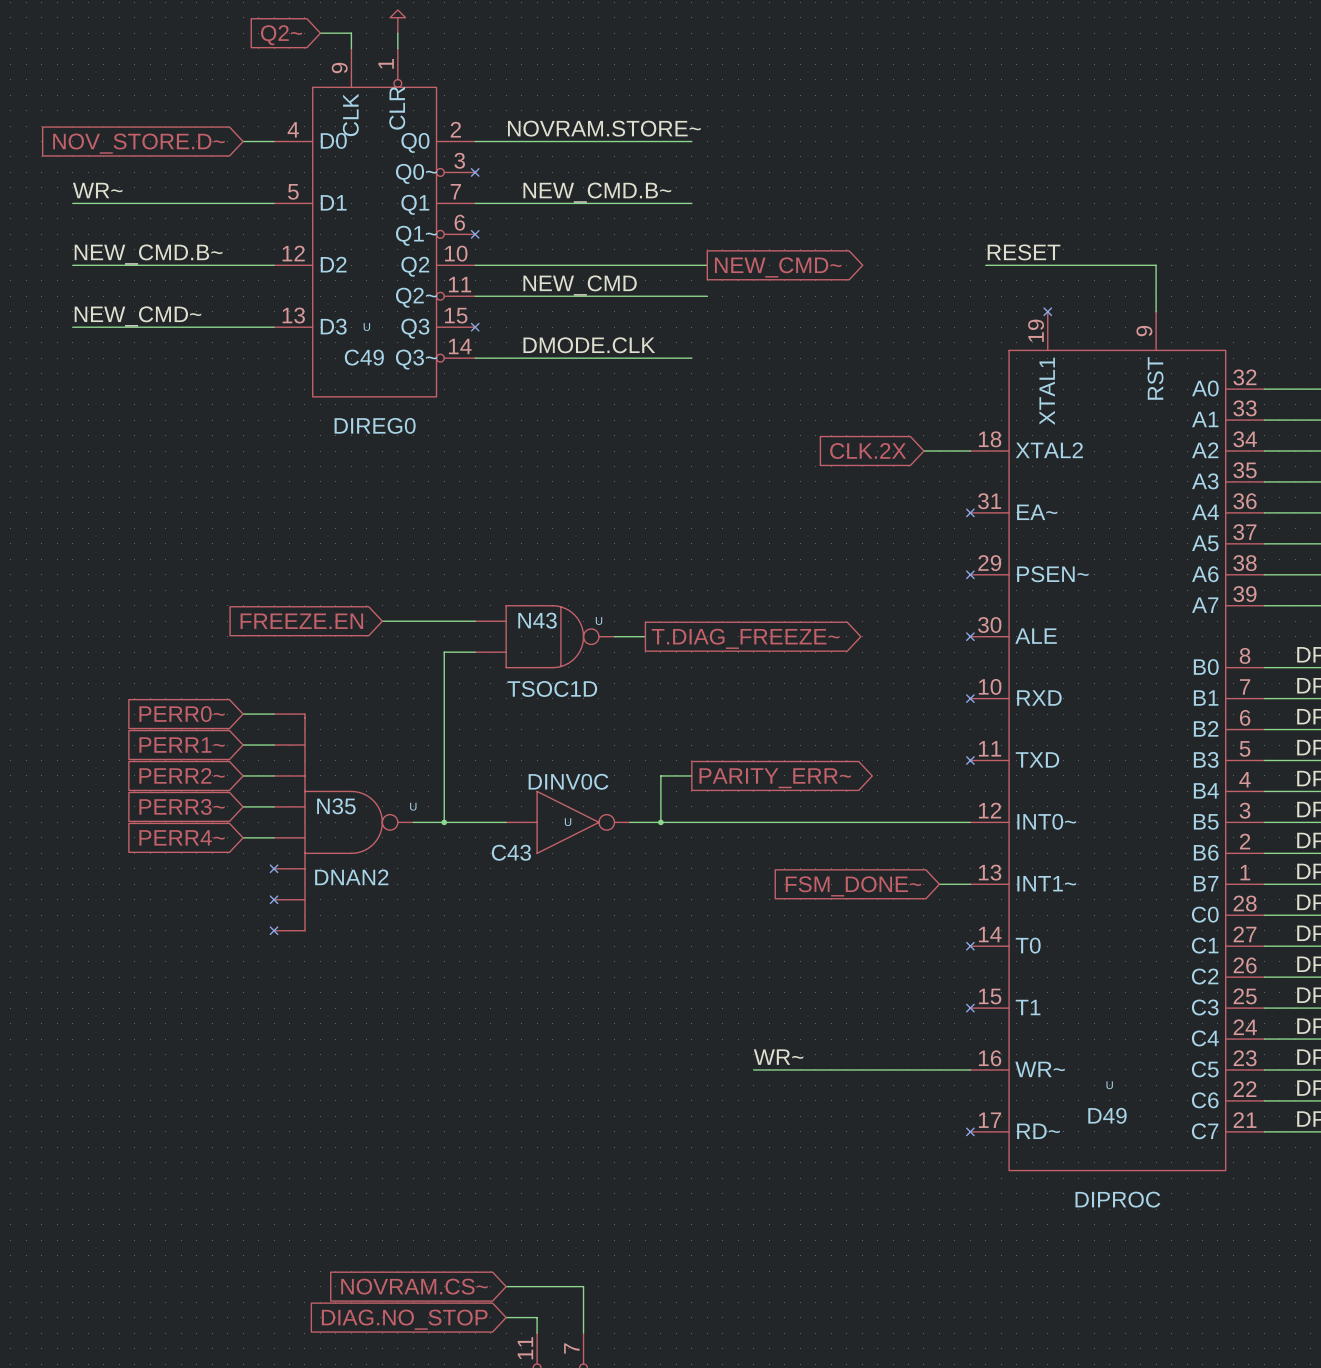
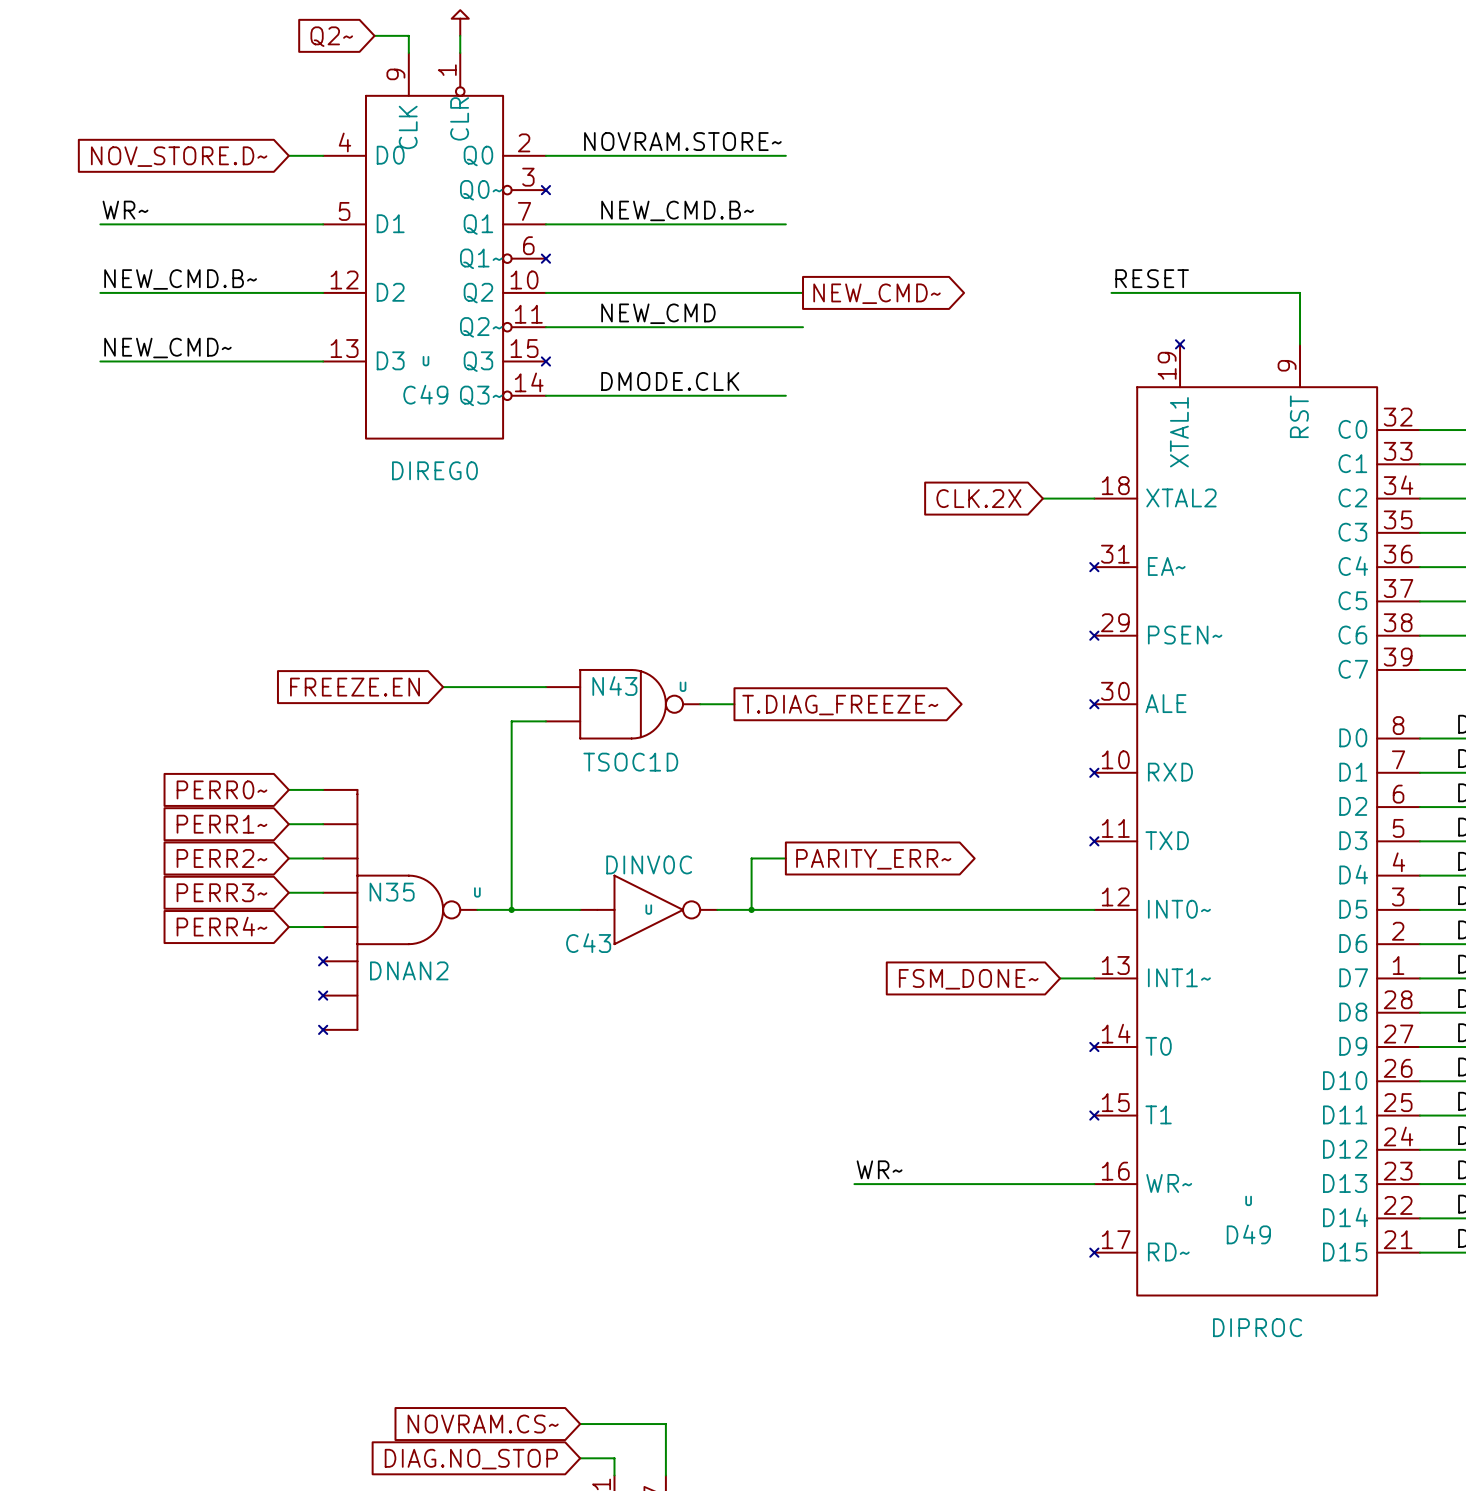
U symbol: [970, 311, 1265, 1171] -> [1094, 344, 1420, 1296]

